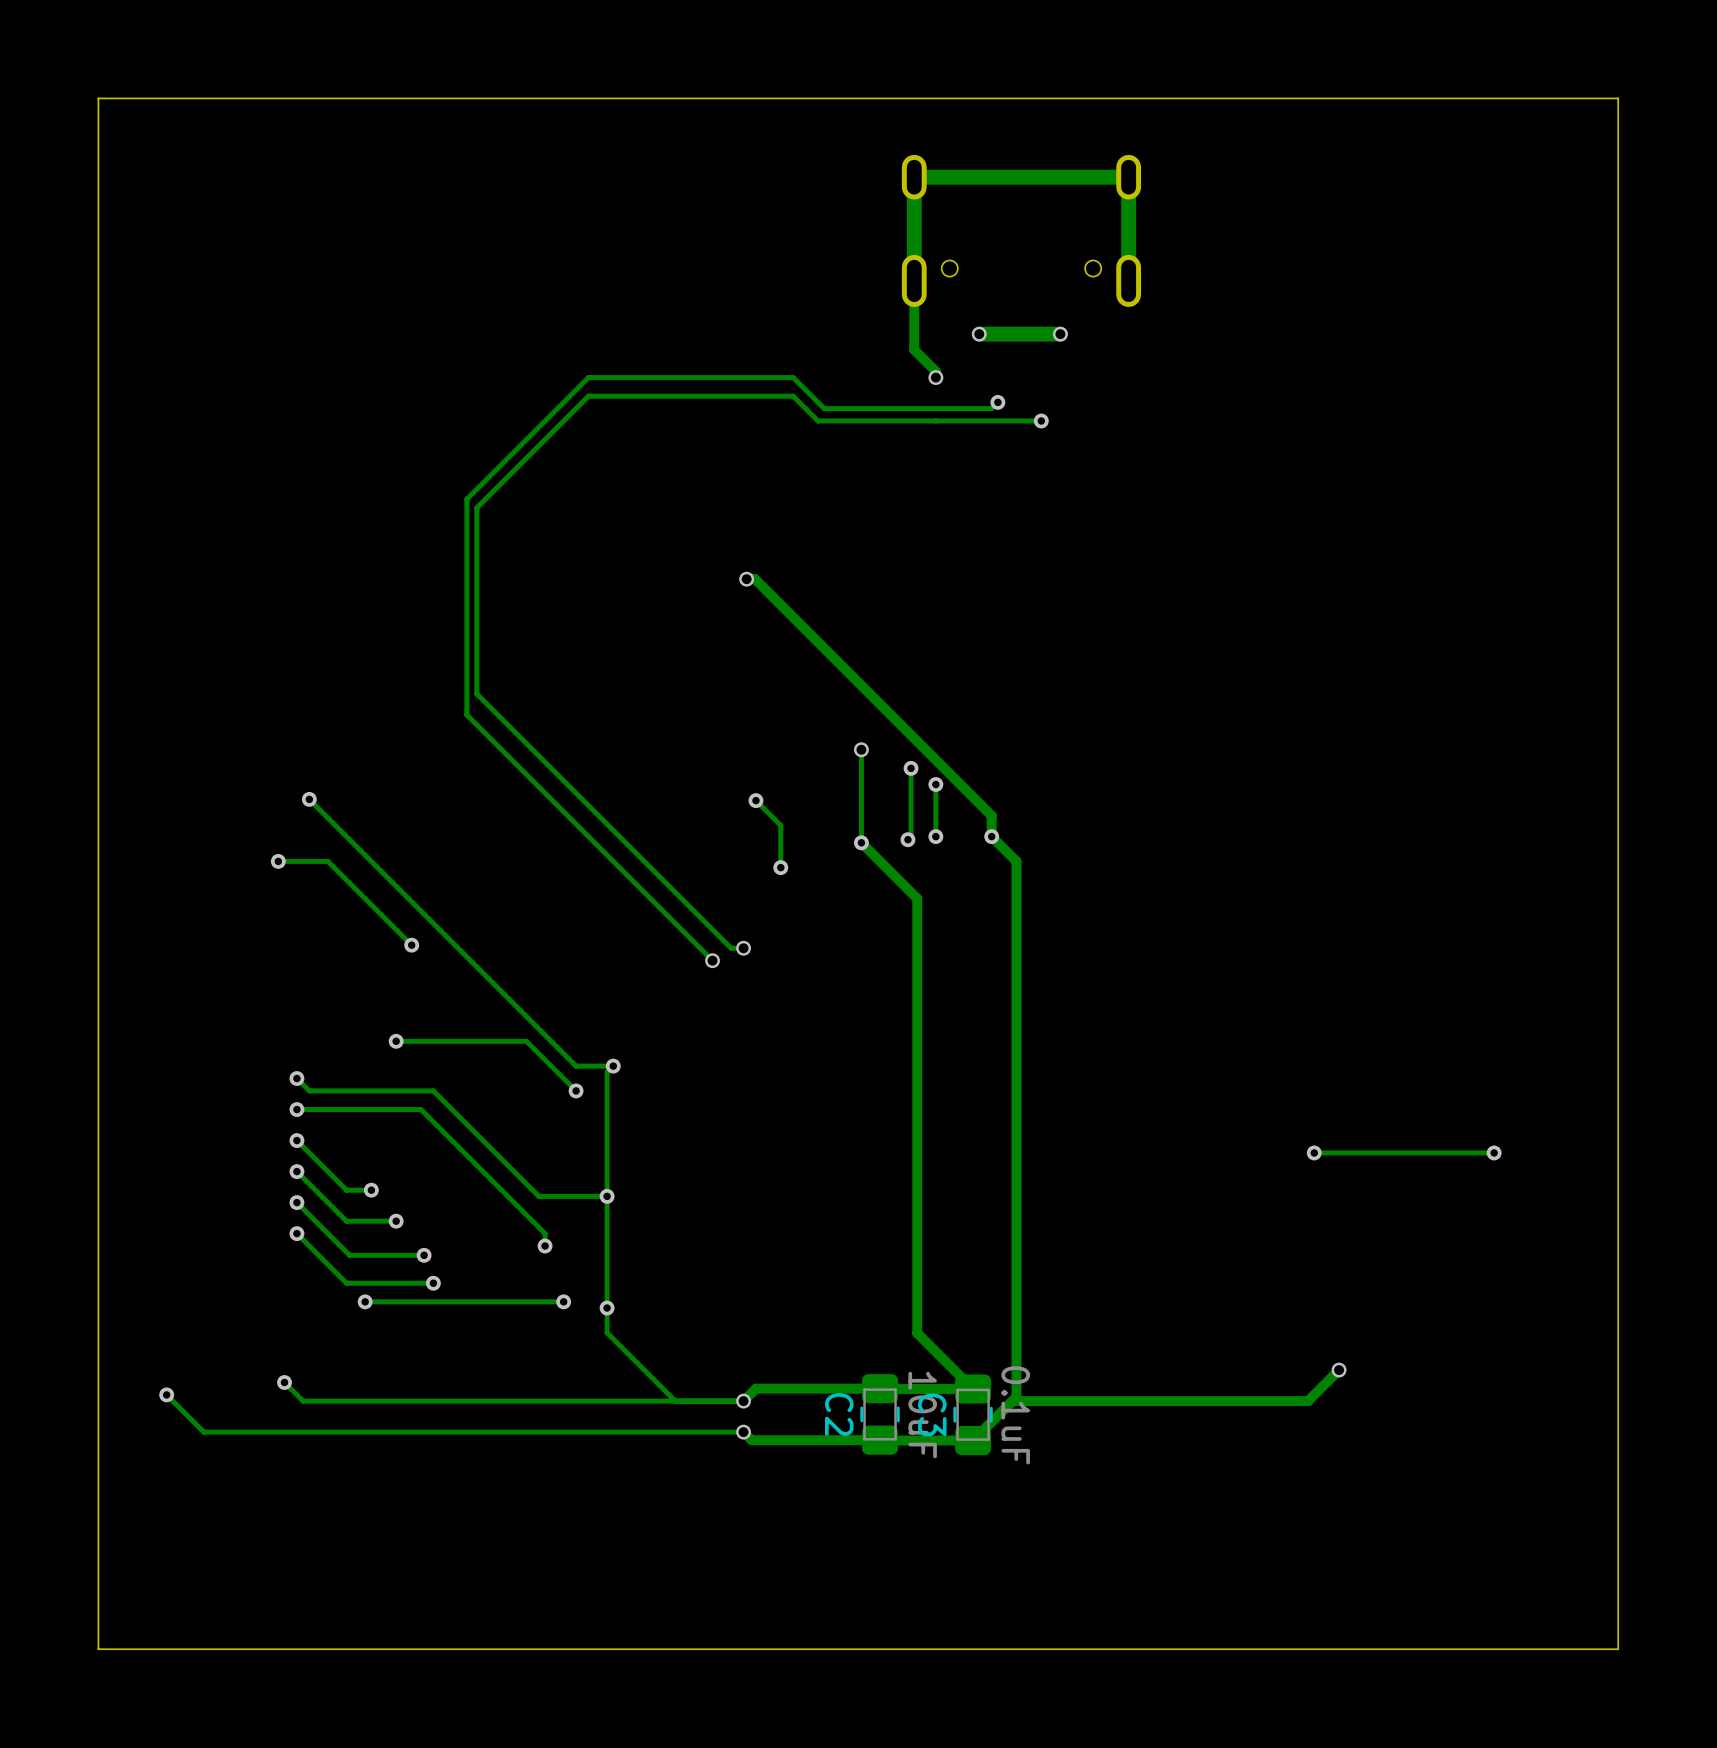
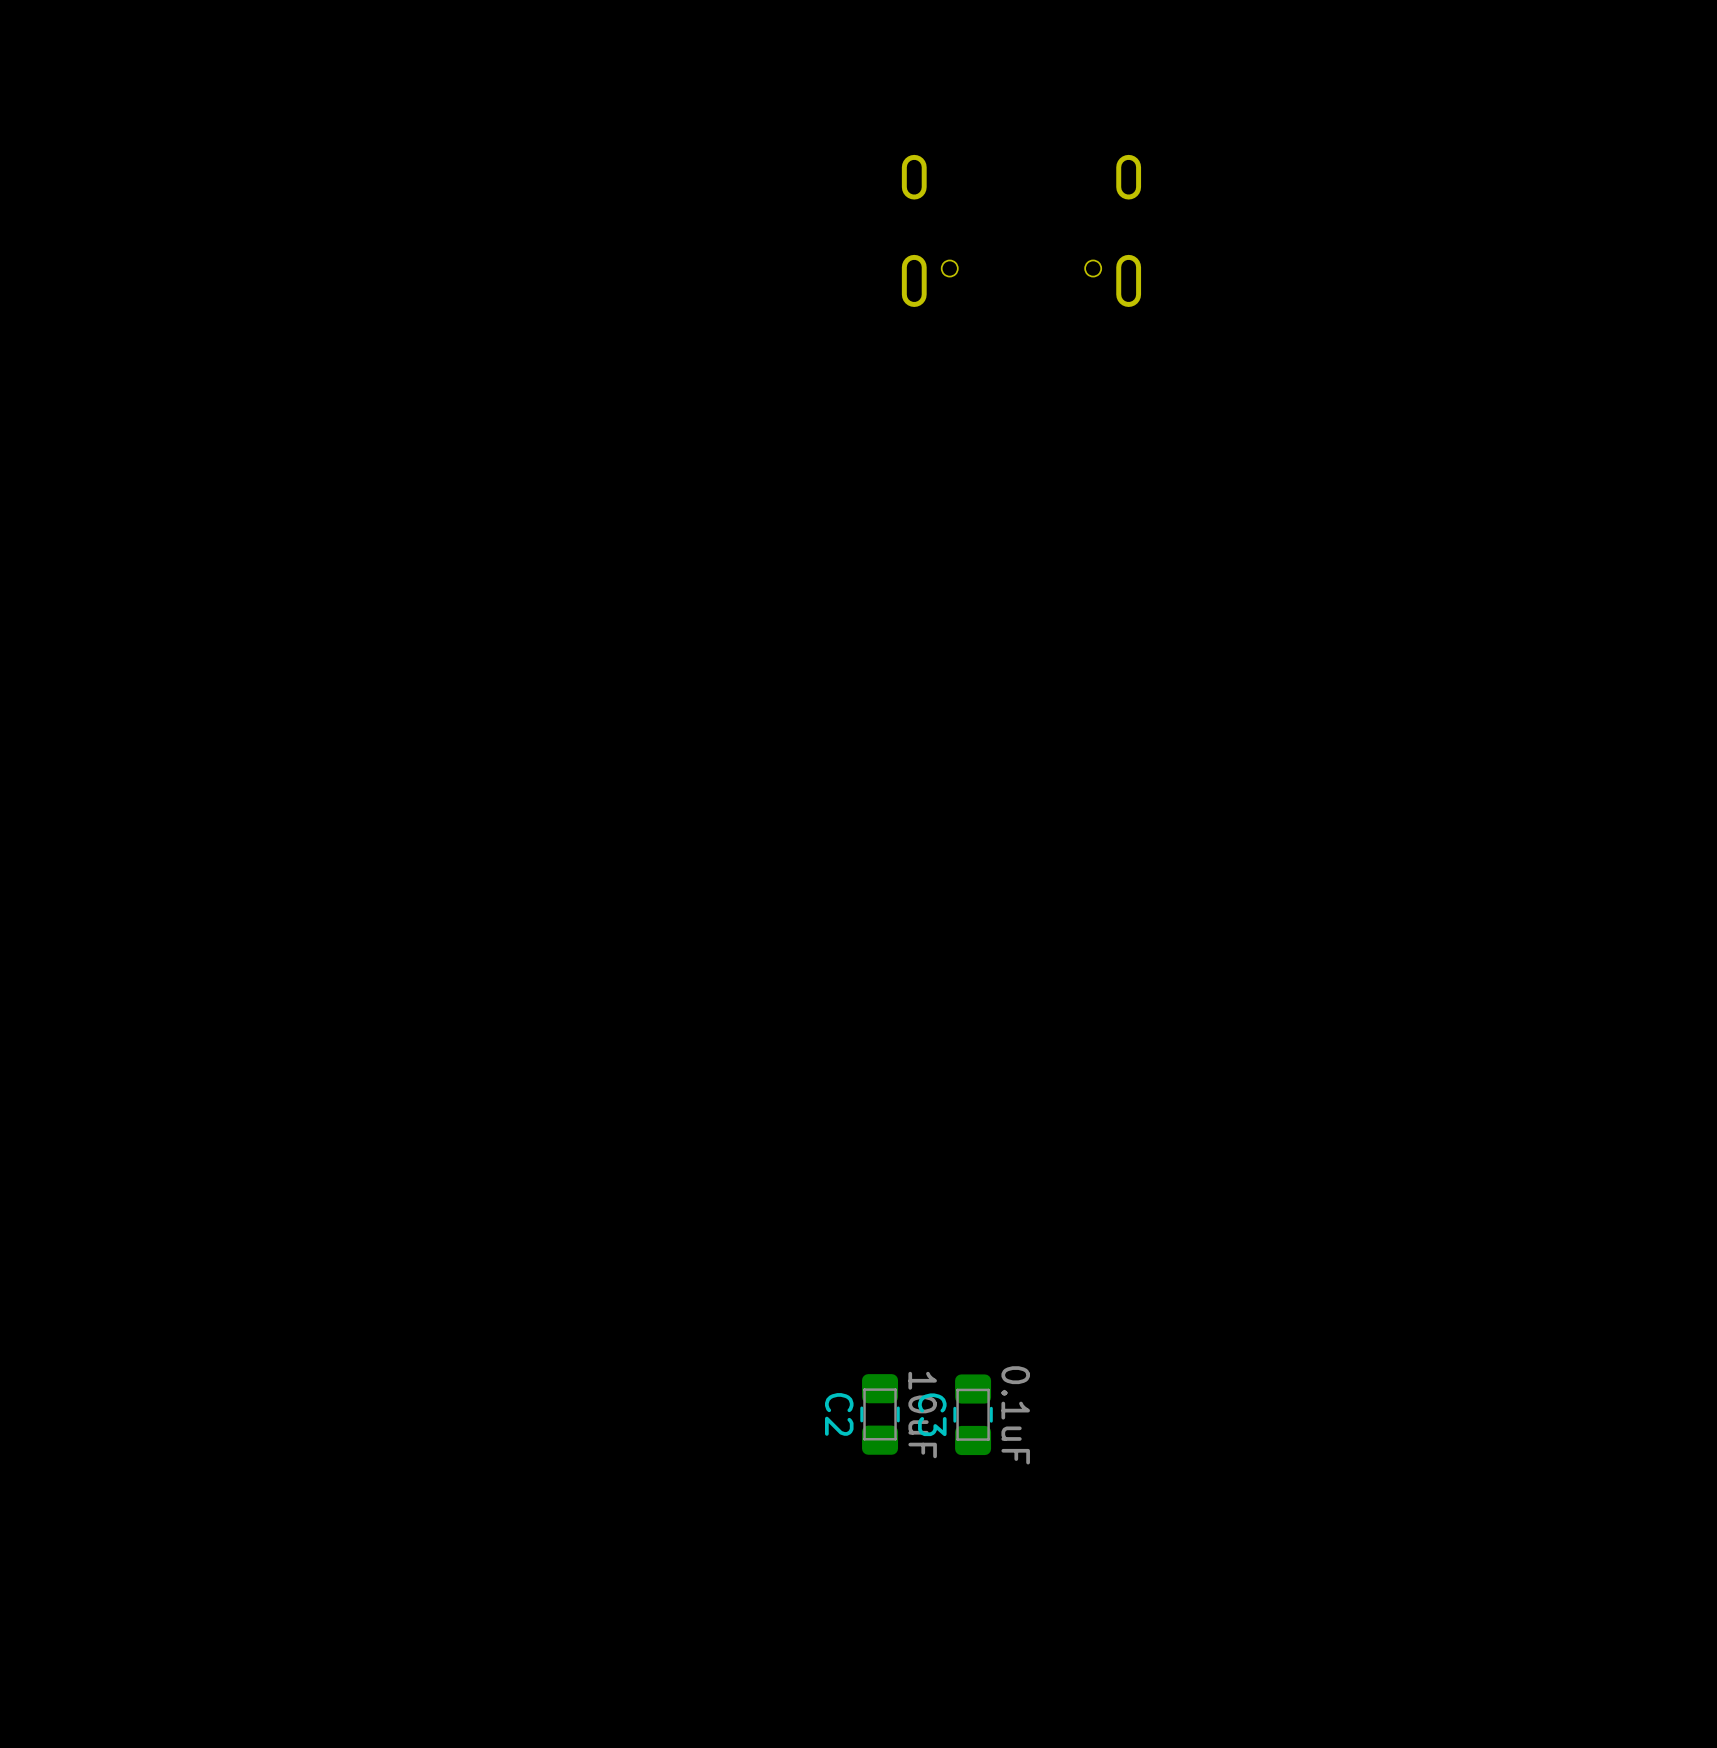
board edge: (1618, 98) (98, 98) (98, 1649) (1618, 1649) (1618, 98) -> none
track: (1128, 280) (1128, 177) (914, 177) (914, 349) (935, 371) (935, 377) -> none
via: (979, 334) -> none
track: (1060, 334) (979, 334) -> none
via: (1060, 334) -> none
via: (935, 377) -> none
track: (997, 402) (991, 408) (824, 408) (793, 377) (588, 377) (466, 499) (466, 715) (712, 960) -> none
via: (997, 402) -> none
track: (1041, 420) (818, 420) (793, 396) (588, 396) (476, 507) (476, 693) (731, 948) (743, 948) -> none
via: (1041, 420) -> none
track: (746, 579) (755, 579) (991, 815) (991, 836) (1016, 861) (1016, 1397) (973, 1440) (880, 1440) -> none
via: (746, 579) -> none
track: (861, 749) (861, 842) (917, 898) (917, 1333) (973, 1389) (880, 1389) -> none
via: (861, 749) -> none
track: (911, 768) (911, 836) (907, 839) -> none
via: (911, 768) -> none
track: (935, 784) (935, 836) -> none
via: (935, 784) -> none
track: (309, 799) (576, 1066) (613, 1066) (607, 1072) (607, 1332) (675, 1401) -> none
via: (309, 799) -> none
track: (755, 800) (780, 825) (780, 867) -> none
via: (755, 800) -> none
via: (935, 836) -> none
via: (991, 836) -> none
via: (907, 839) -> none
via: (861, 842) -> none
track: (278, 861) (327, 861) (411, 945) -> none
via: (278, 861) -> none
via: (780, 867) -> none
via: (411, 945) -> none
via: (743, 948) -> none
via: (712, 960) -> none
track: (396, 1041) (526, 1041) (576, 1090) -> none
via: (396, 1041) -> none
via: (613, 1066) -> none
track: (296, 1078) (309, 1090) (433, 1090) (538, 1196) (607, 1196) -> none
via: (296, 1078) -> none
via: (576, 1090) -> none
track: (296, 1109) (420, 1109) (545, 1233) (545, 1246) -> none
via: (296, 1109) -> none
track: (296, 1140) (346, 1190) (371, 1190) -> none
via: (296, 1140) -> none
via: (1314, 1152) -> none
track: (1494, 1152) (1314, 1152) -> none
via: (1494, 1152) -> none
track: (296, 1171) (346, 1221) (396, 1221) -> none
via: (296, 1171) -> none
via: (371, 1190) -> none
via: (607, 1196) -> none
track: (296, 1202) (349, 1255) (424, 1255) -> none
via: (296, 1202) -> none
via: (396, 1221) -> none
track: (296, 1233) (346, 1283) (433, 1283) -> none
via: (296, 1233) -> none
via: (545, 1246) -> none
via: (424, 1255) -> none
via: (433, 1283) -> none
via: (365, 1301) -> none
track: (563, 1301) (365, 1301) -> none
via: (563, 1301) -> none
via: (607, 1308) -> none
track: (1339, 1370) (1308, 1401) (1012, 1401) -> none
via: (1339, 1370) -> none
track: (284, 1382) (303, 1401) (743, 1401) (755, 1388) (880, 1388) -> none
via: (284, 1382) -> none
track: (166, 1394) (203, 1432) (743, 1432) (751, 1440) (880, 1440) -> none
via: (166, 1394) -> none
via: (743, 1401) -> none
via: (743, 1432) -> none

